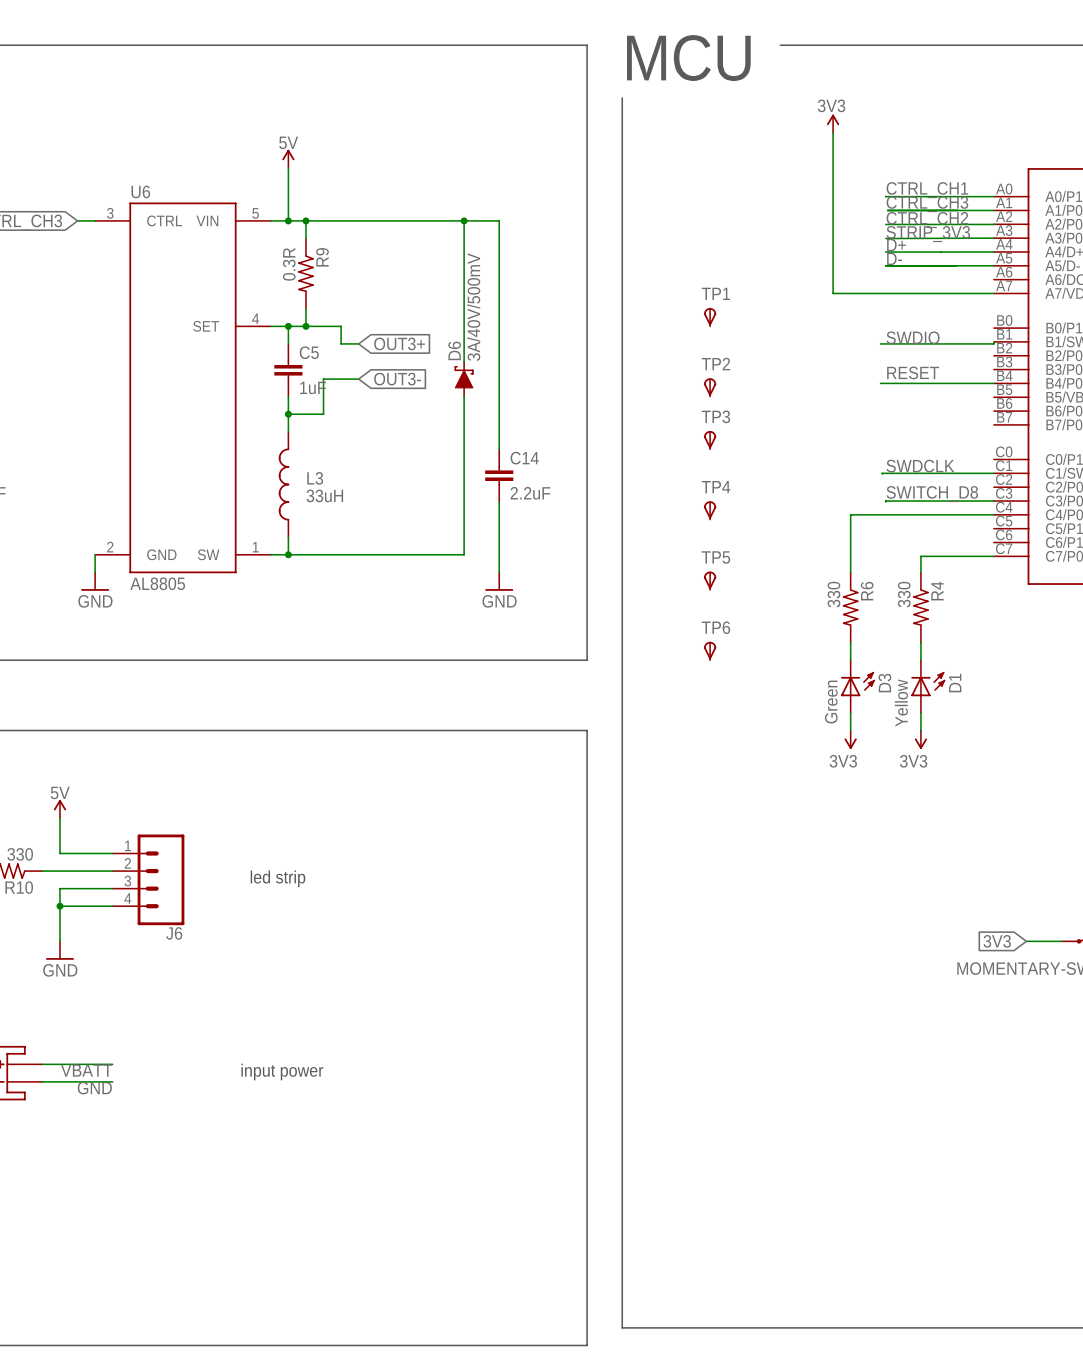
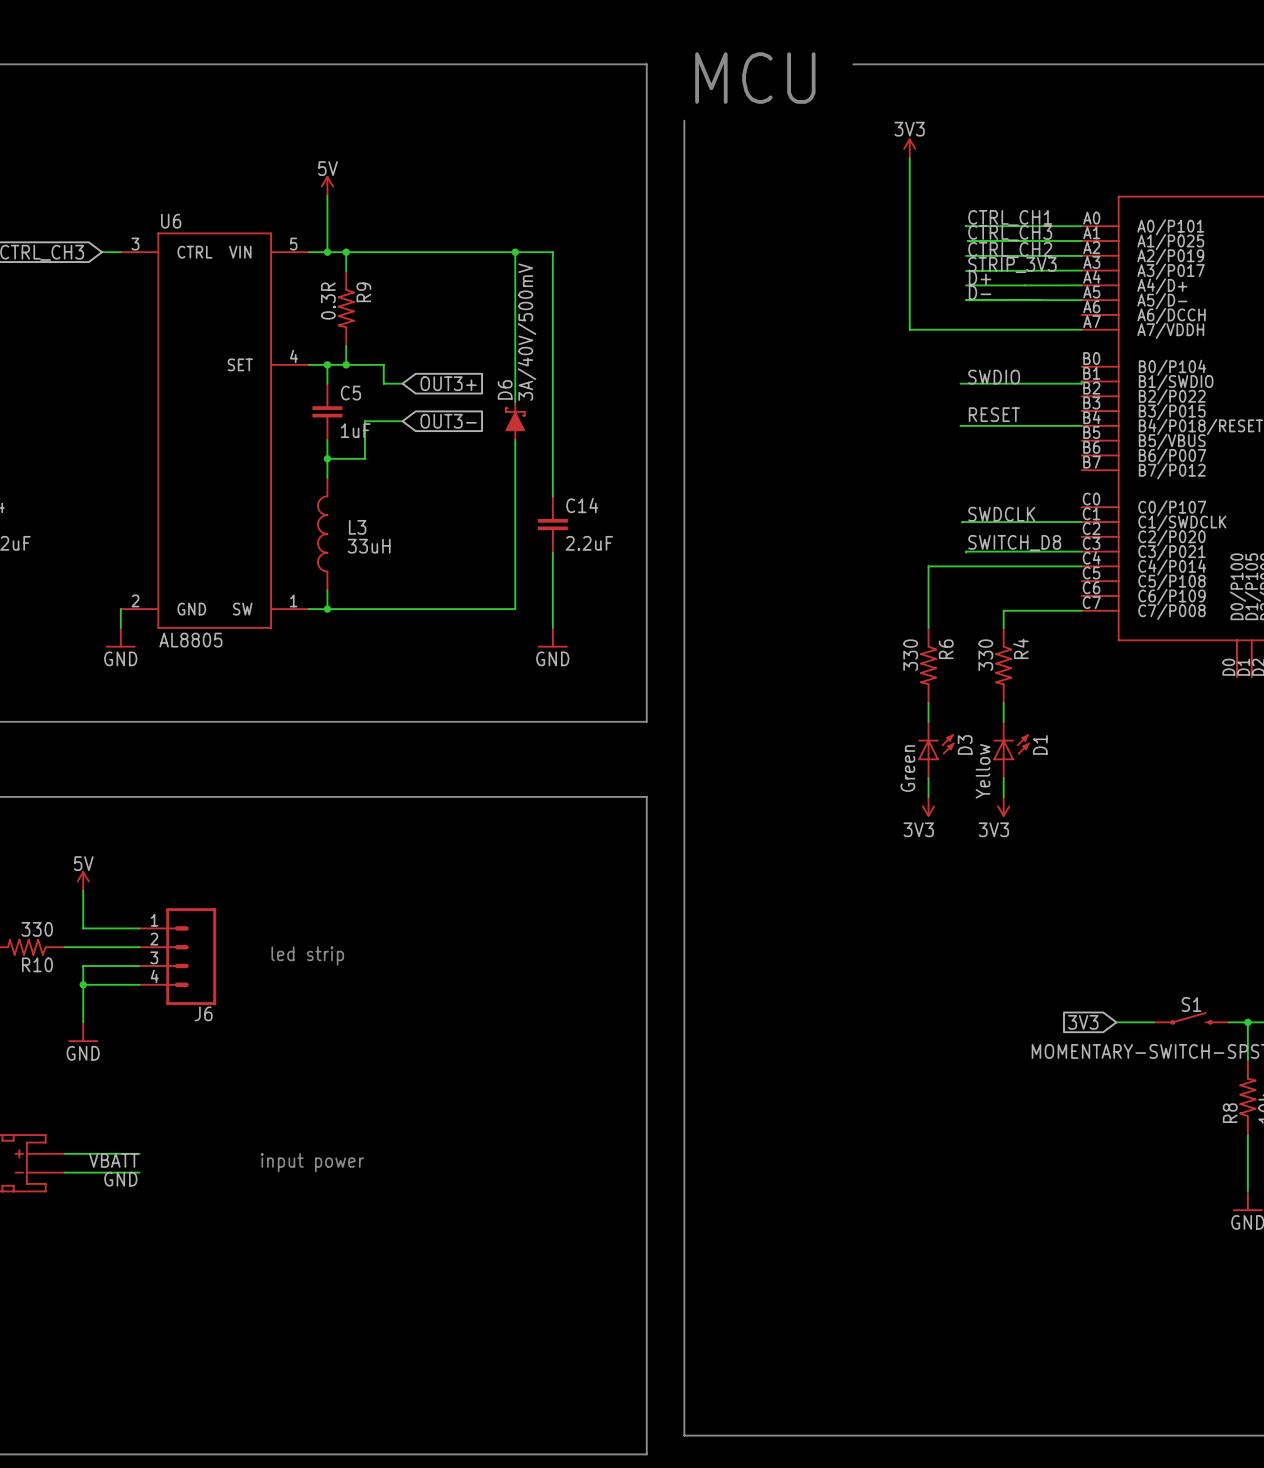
TP1: (710, 317) -> none
TP2: (710, 387) -> none
TP3: (710, 440) -> none
TP4: (710, 510) -> none
TP5: (710, 580) -> none
TP6: (710, 650) -> none

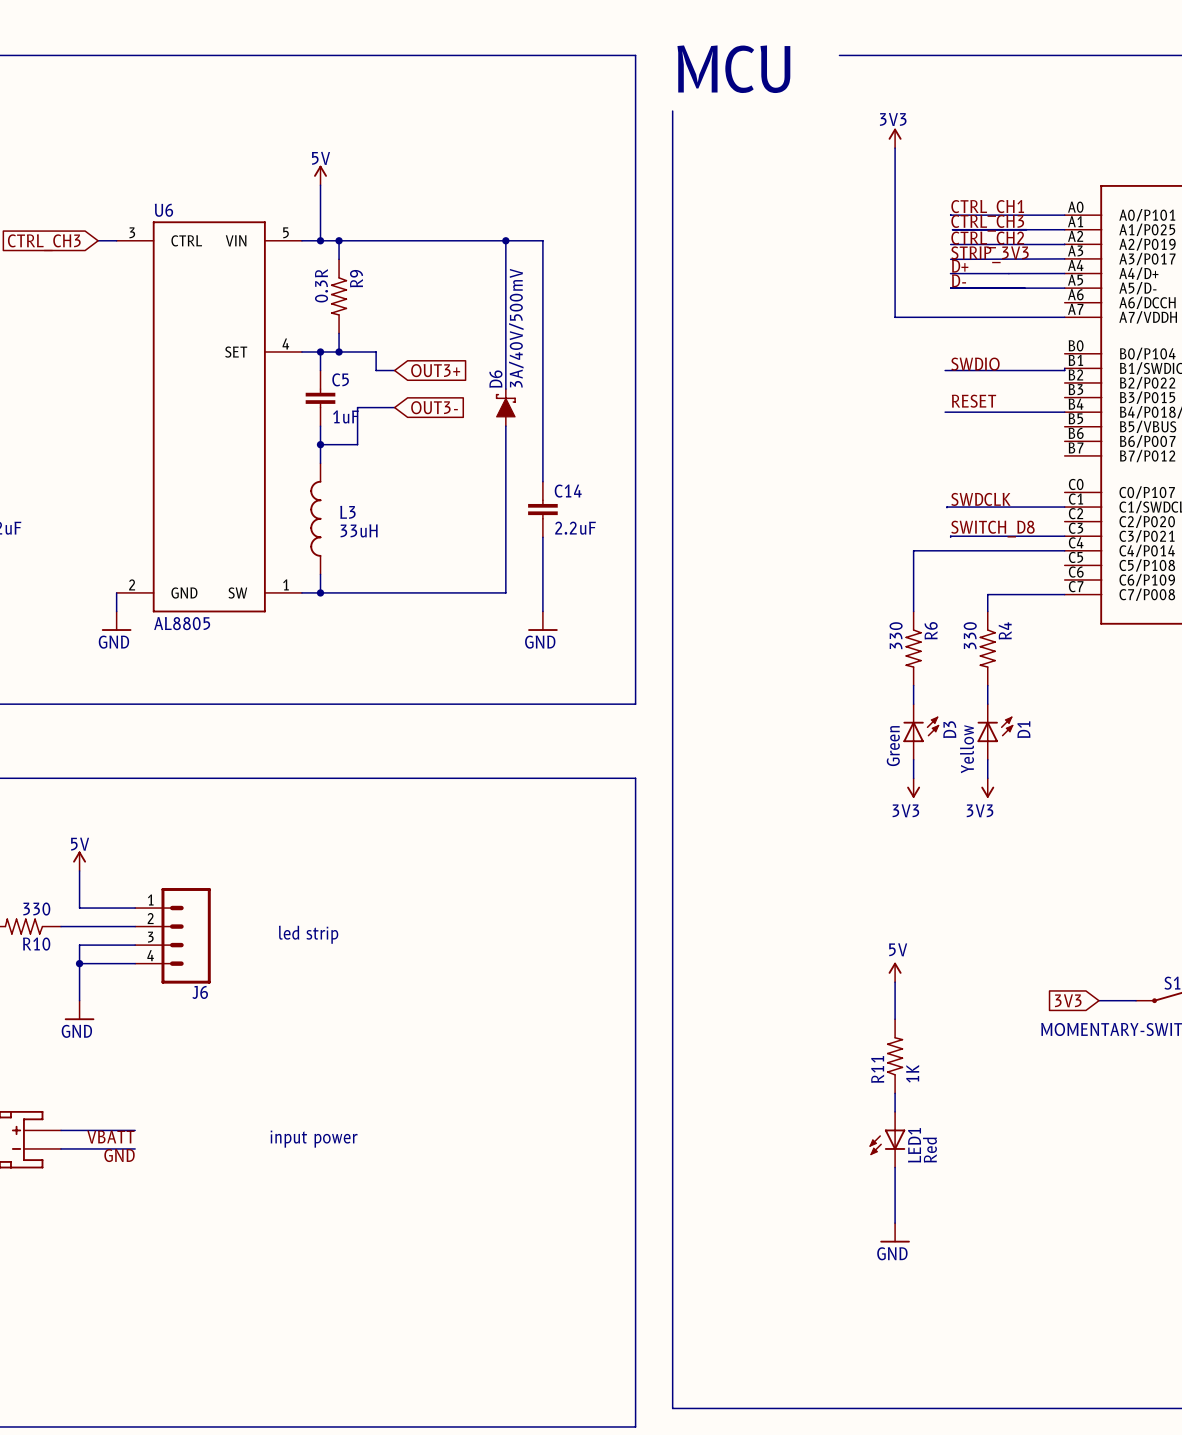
power symbol: none -> 5V (895, 972)
wire: none -> (895, 982) (895, 1019)
R11: none -> 1K (895, 1056)
wire: none -> (895, 1093) (895, 1111)
LED1: none -> Red (887, 1139)
wire: none -> (895, 1167) (895, 1223)
power symbol: none -> GND (895, 1232)

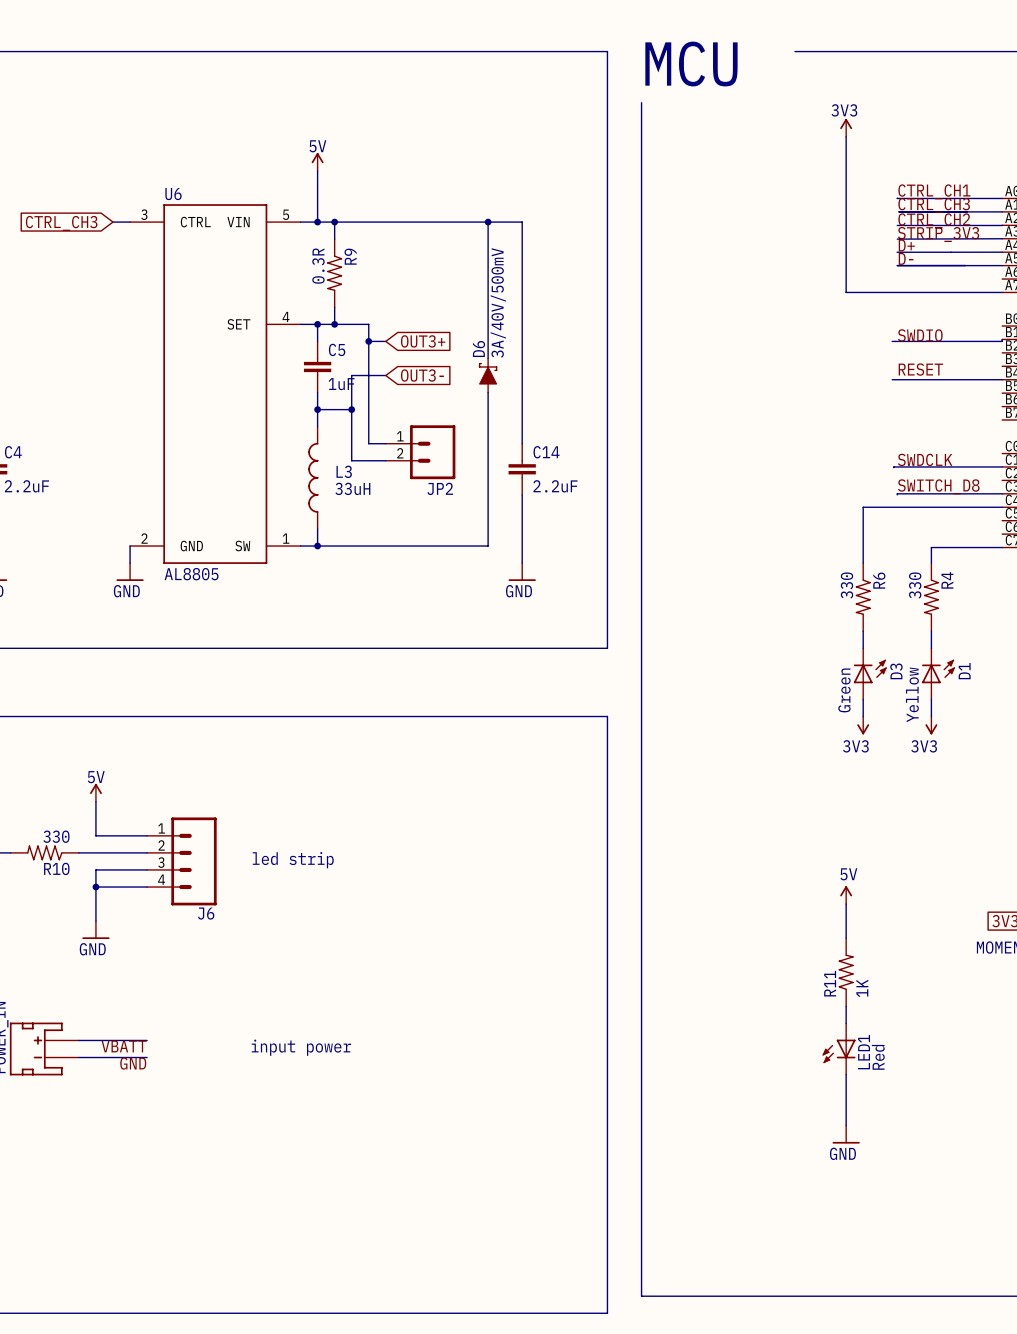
wire: none -> (368, 341) (368, 443) (385, 443)
junction: none -> (368, 341)
wire: none -> (351, 409) (351, 460) (385, 460)
junction: none -> (351, 409)
JP2: none -> (420, 452)

